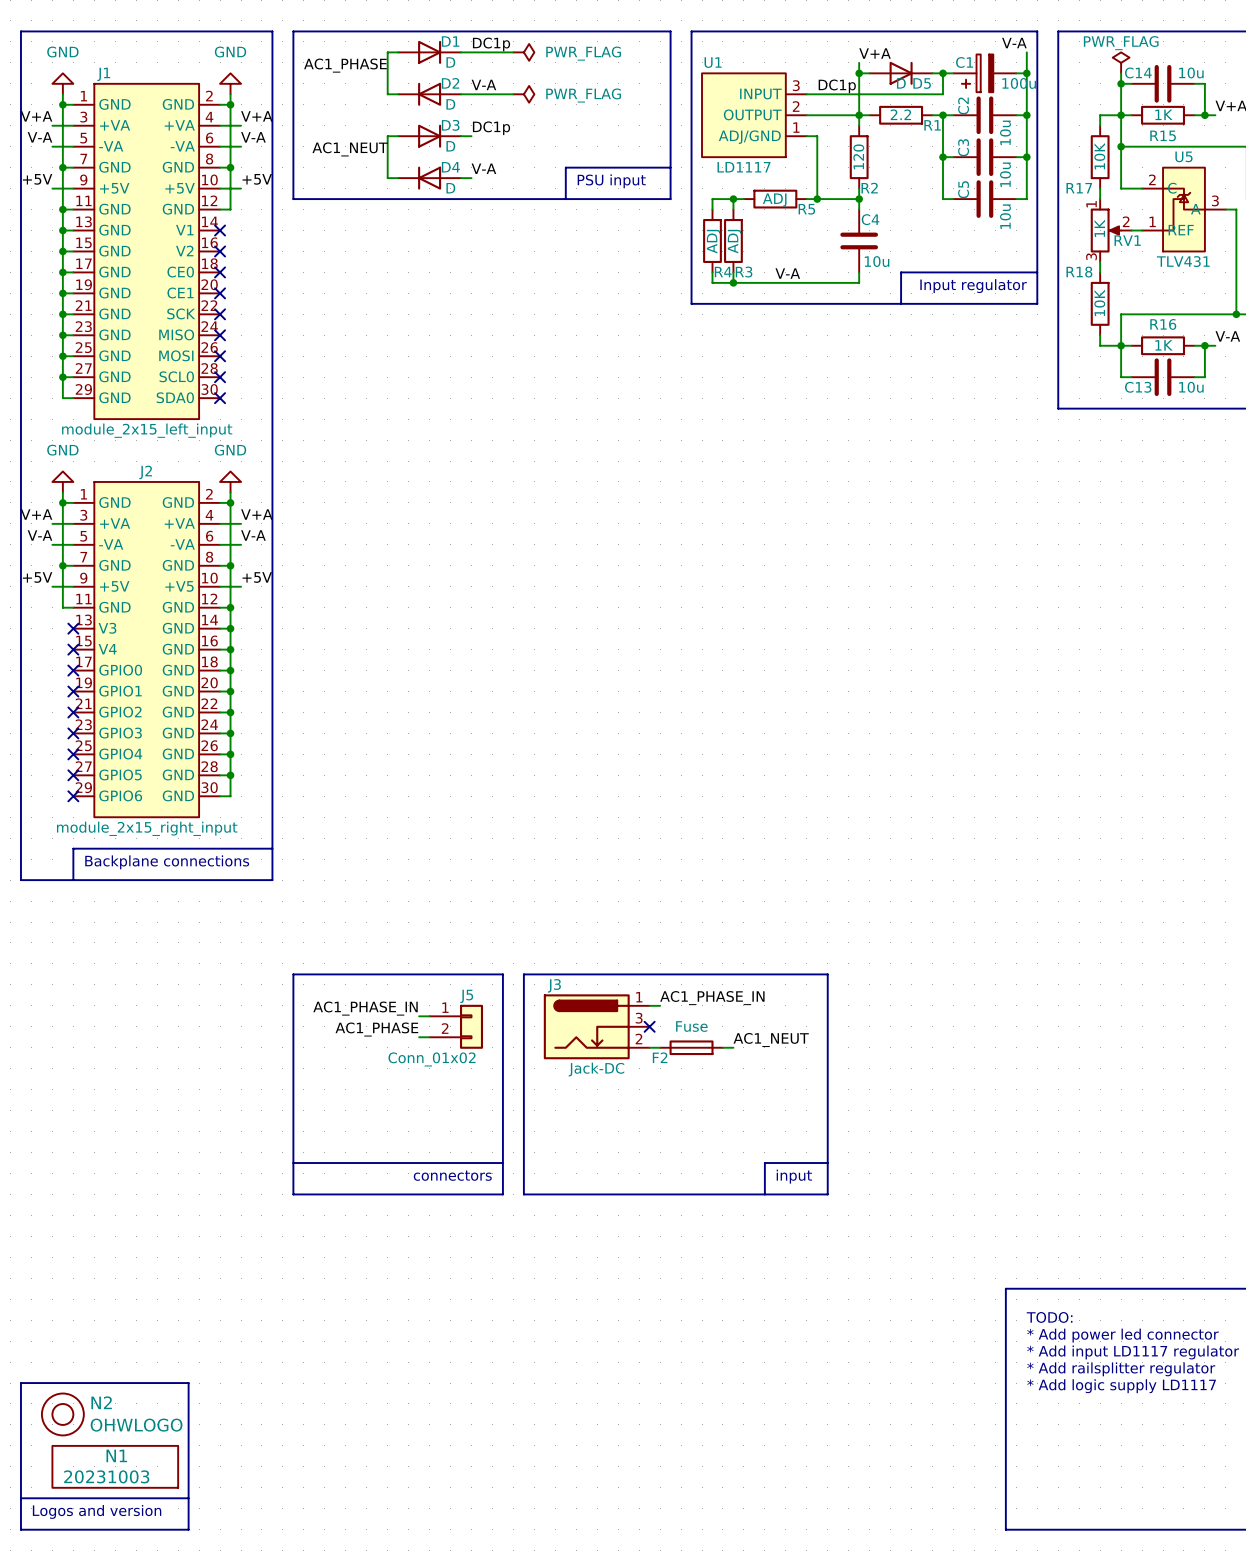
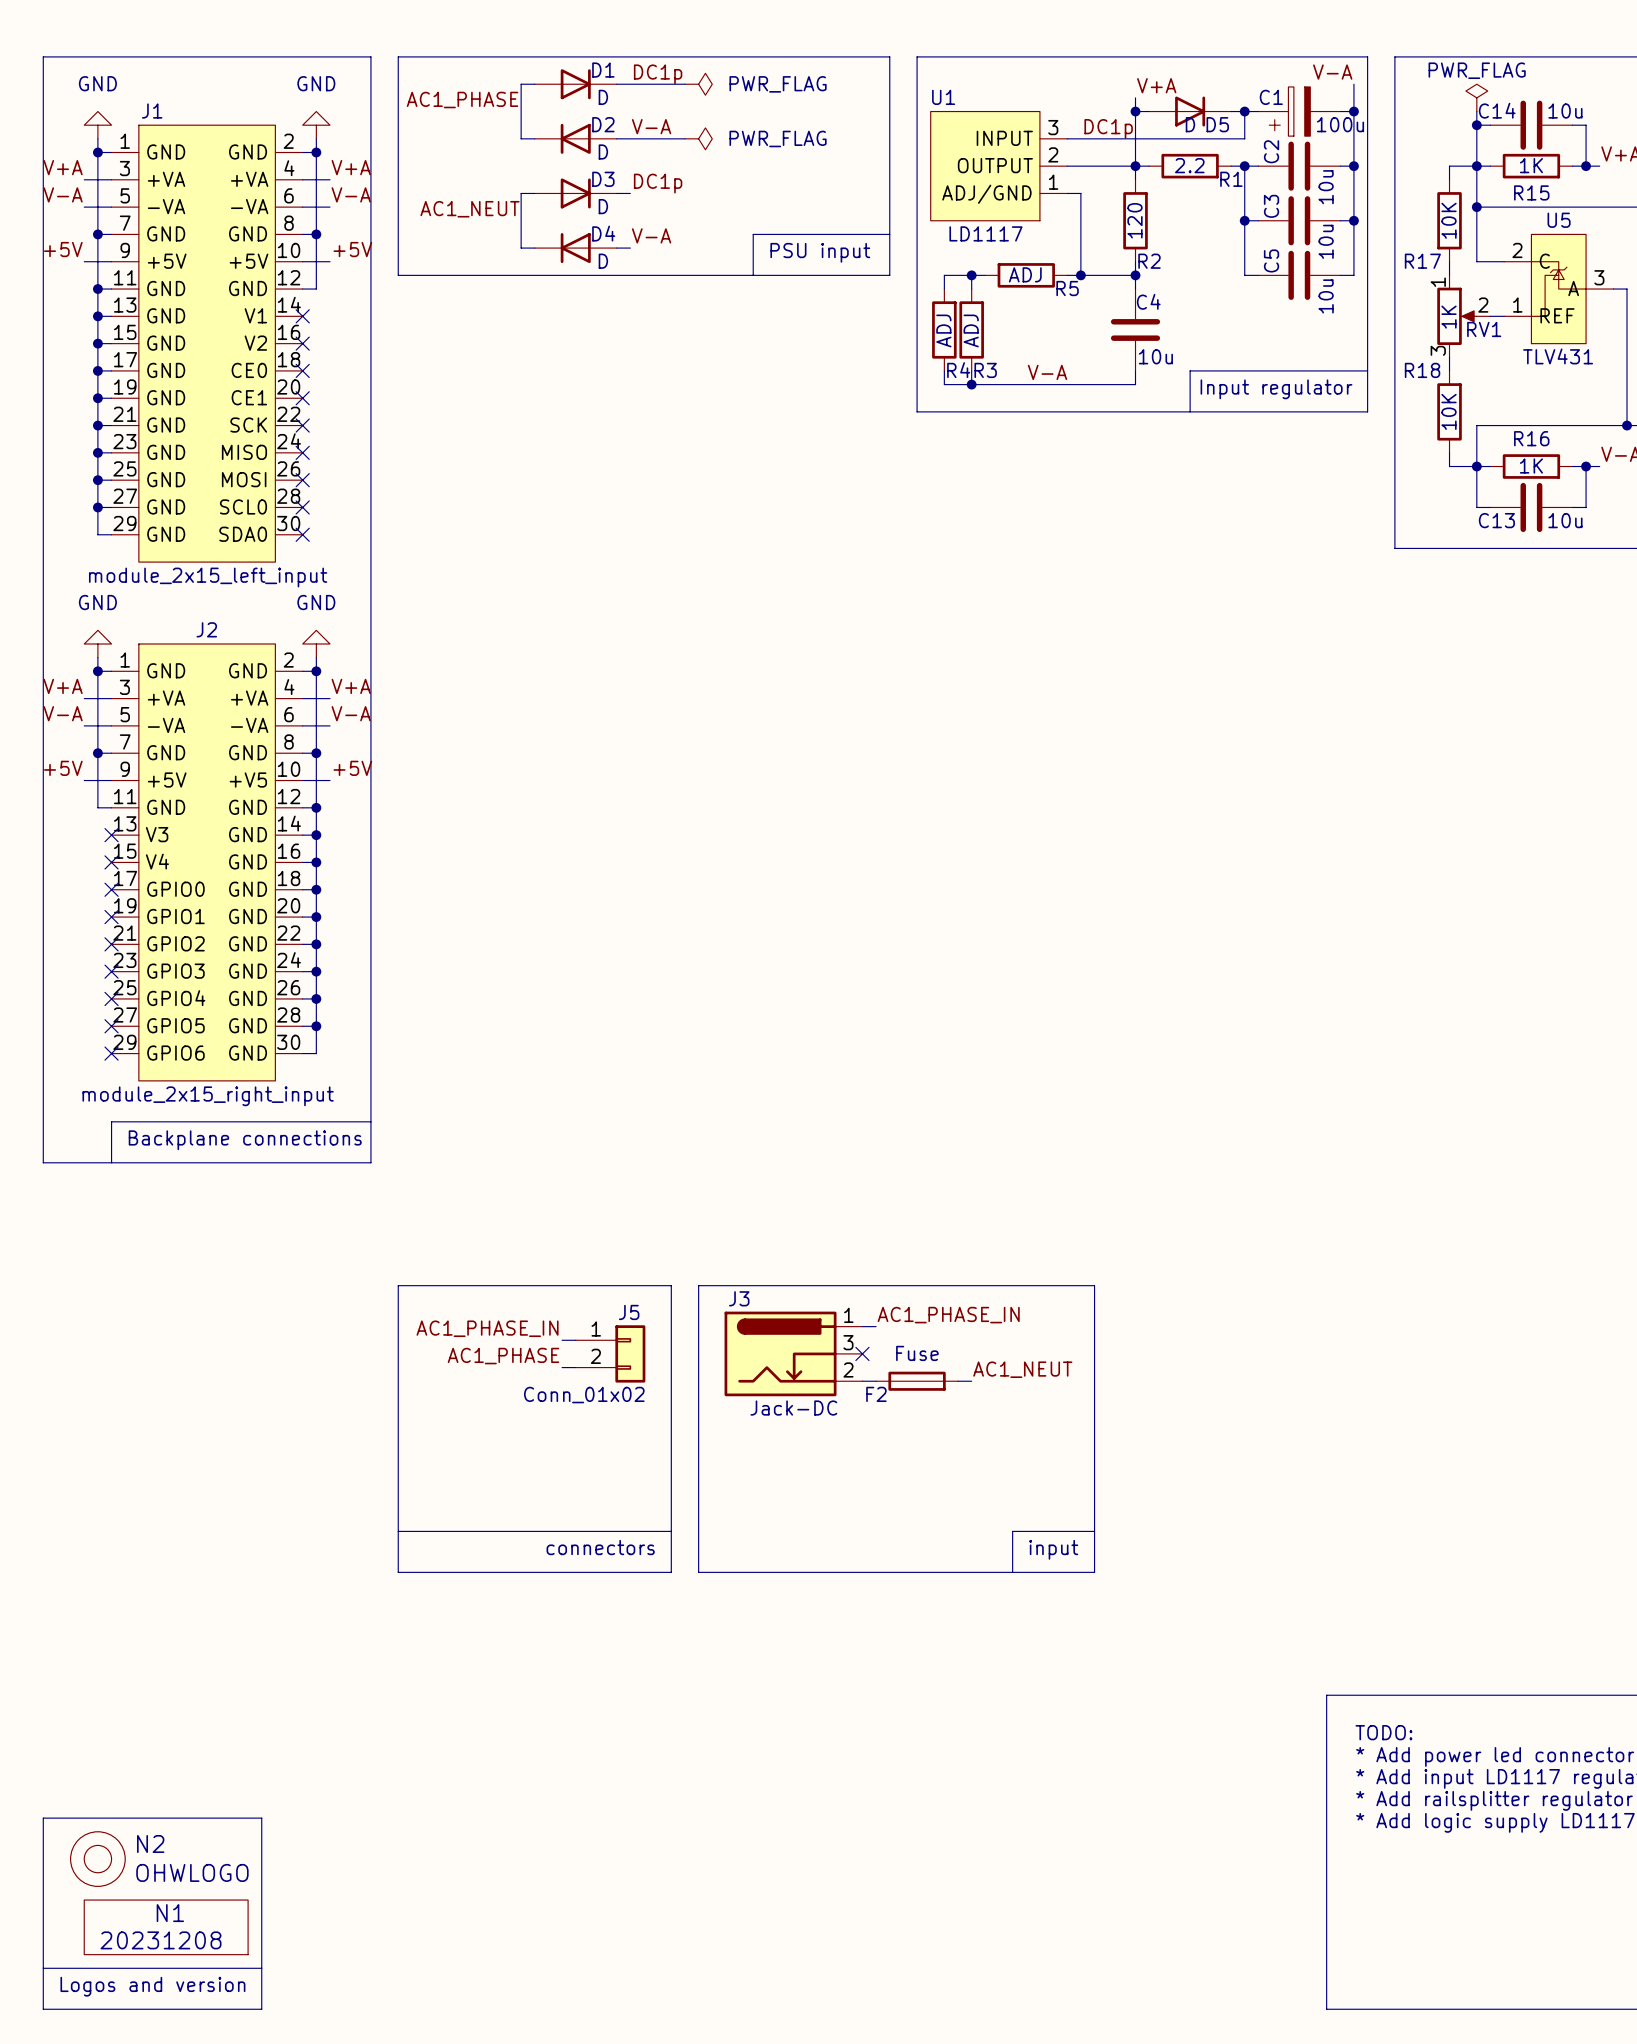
N1 value: 20231003 (106, 1476) -> 20231208 (161, 1940)

